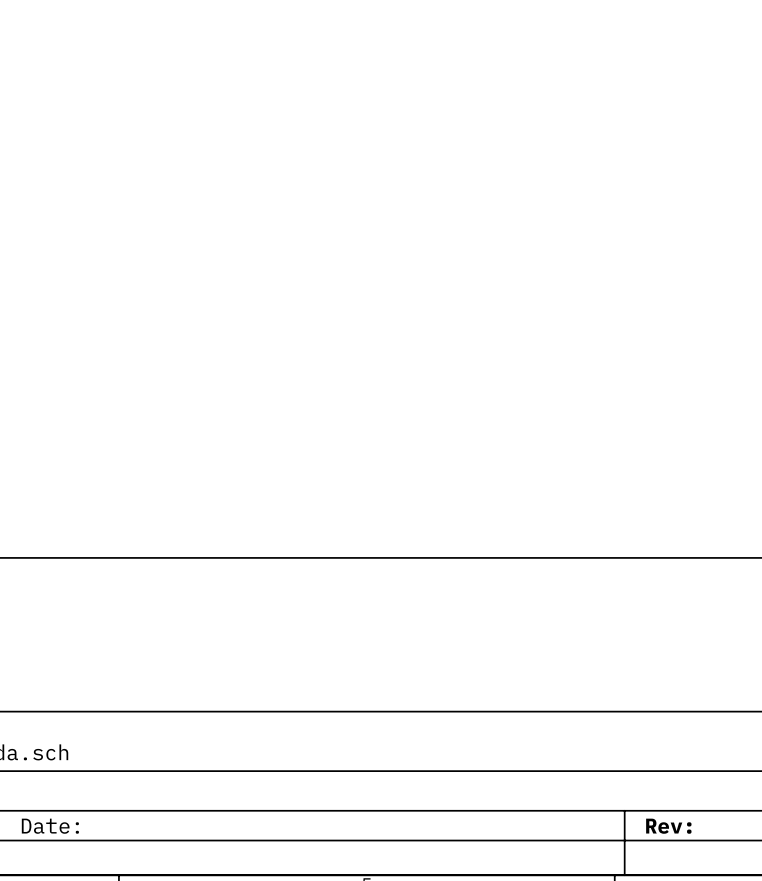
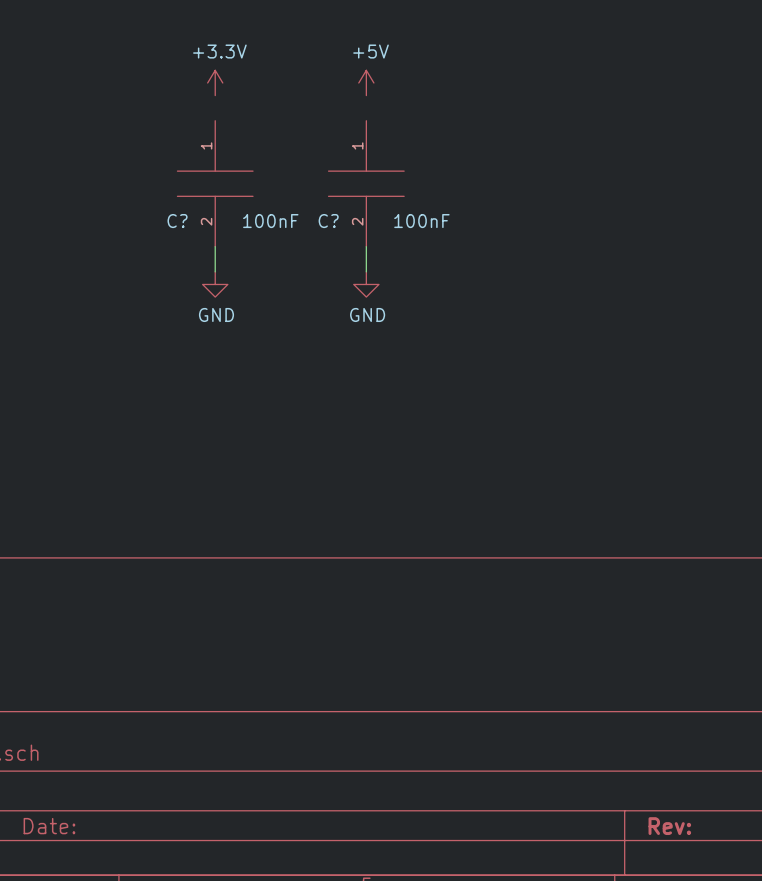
power symbol: none -> +3.3V (215, 82)
power symbol: none -> +5V (366, 82)
C?: none -> 100nF (215, 183)
C?: none -> 100nF (366, 183)
wire: none -> (215, 246) (215, 271)
wire: none -> (366, 246) (366, 271)
power symbol: none -> GND (215, 284)
power symbol: none -> GND (366, 284)

